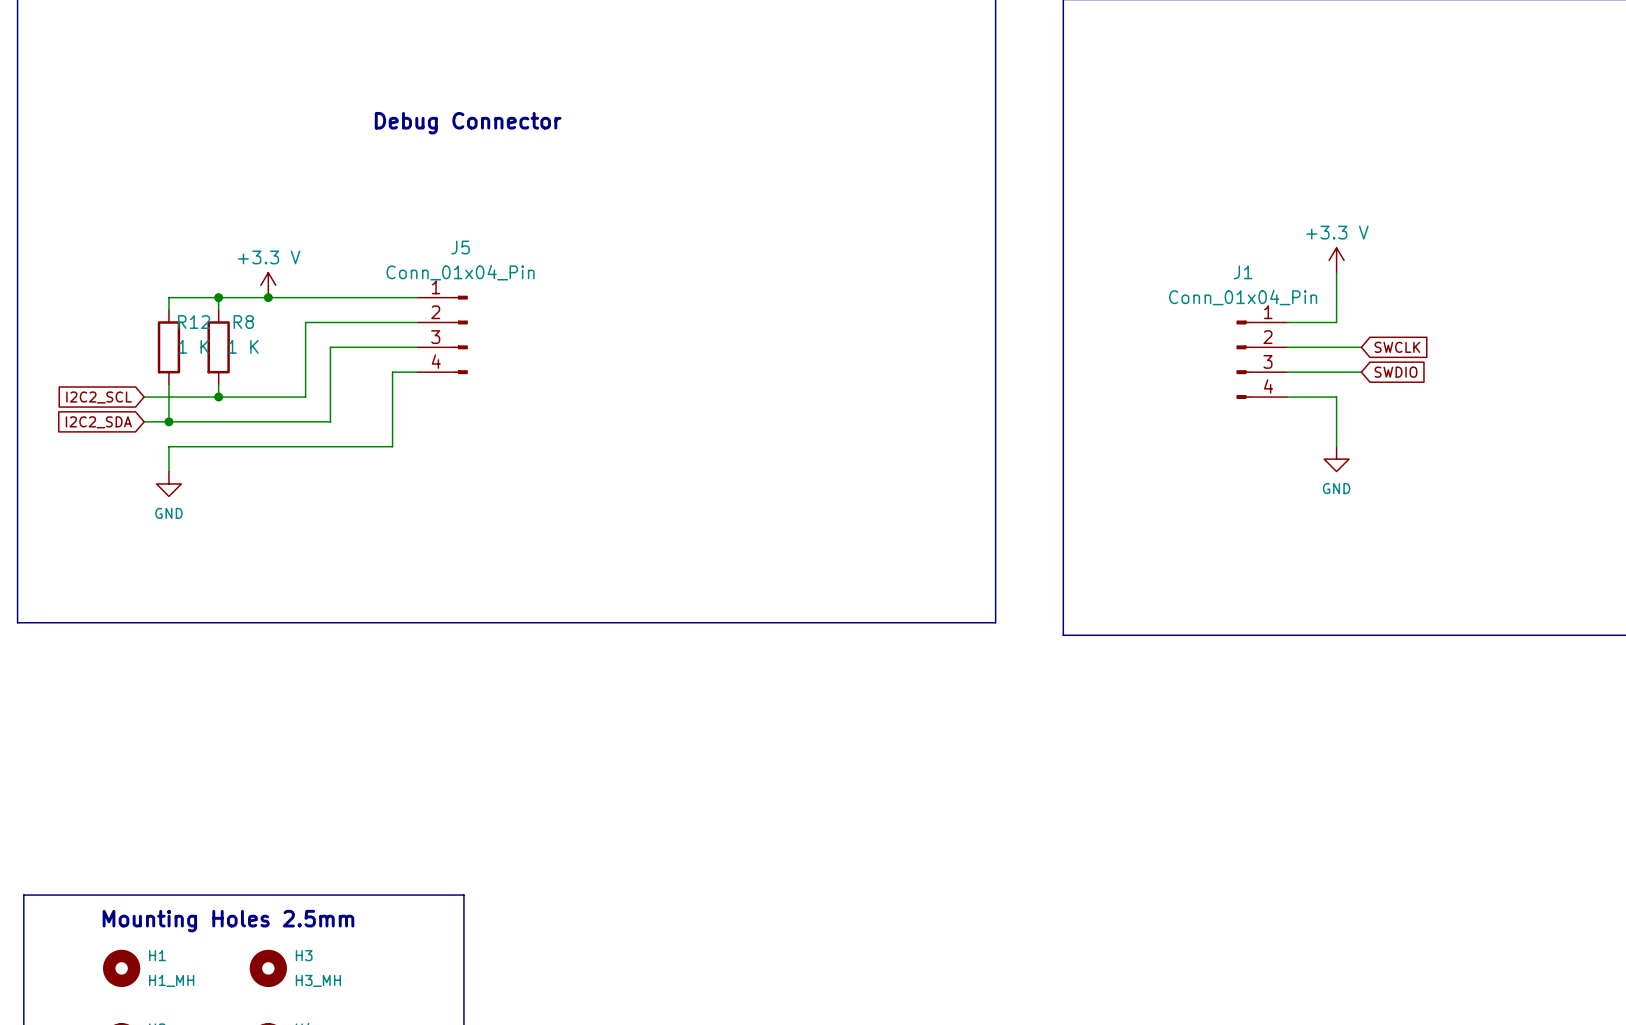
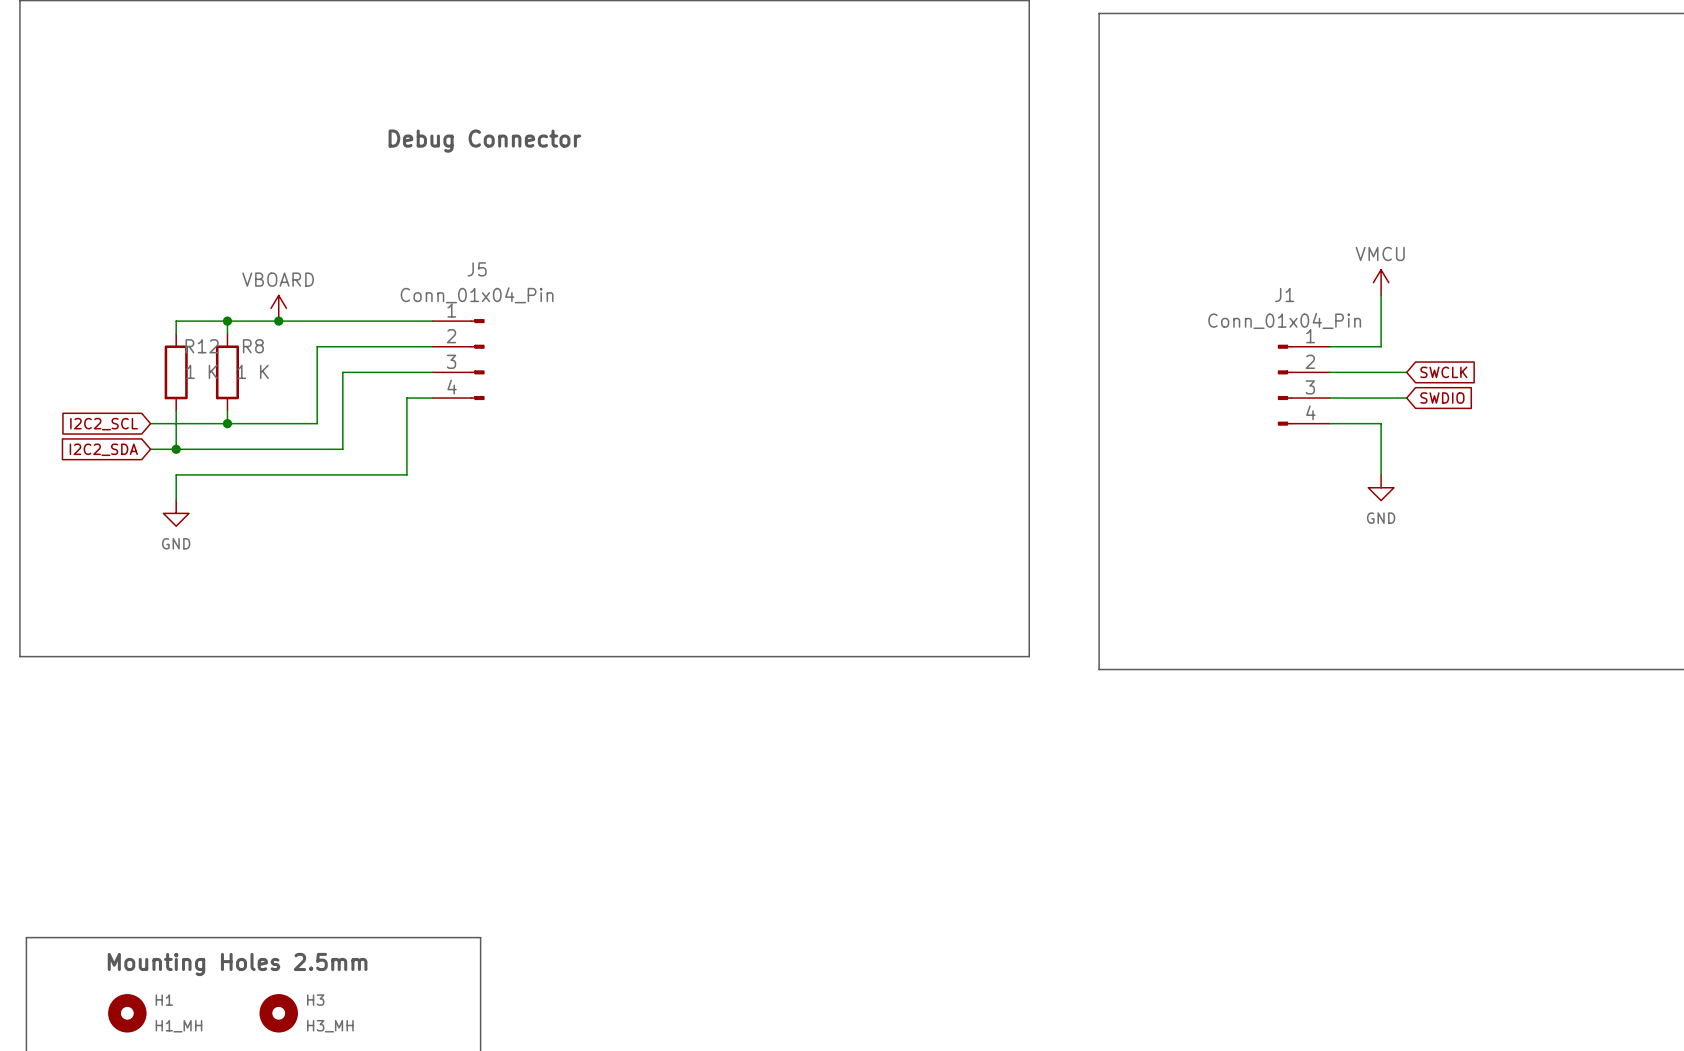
power symbol: +3.3 V (1336, 260) -> VMCU (1381, 282)
power symbol: +3.3 V (268, 285) -> VBOARD (278, 308)

